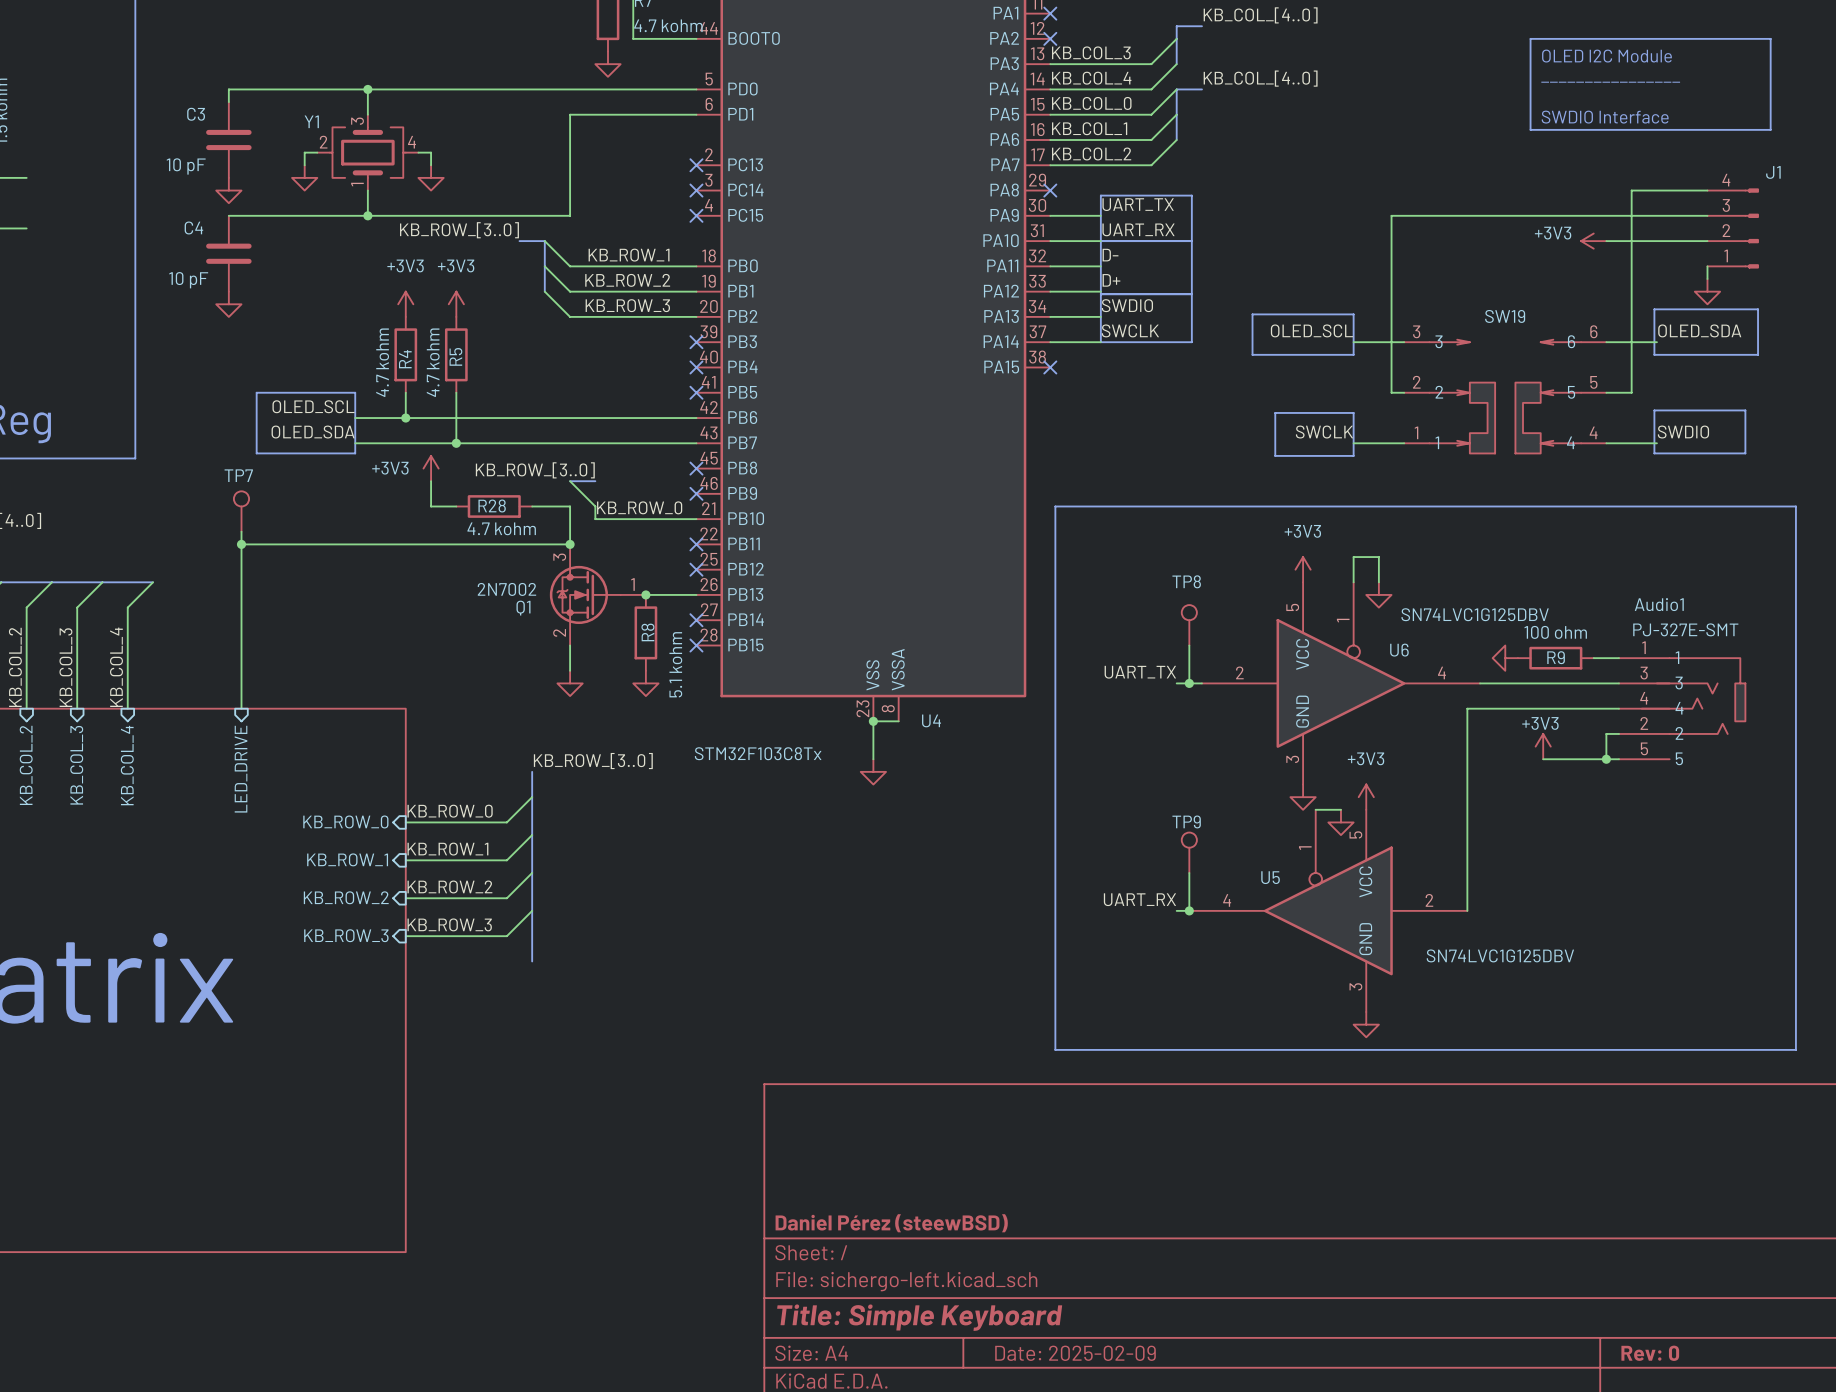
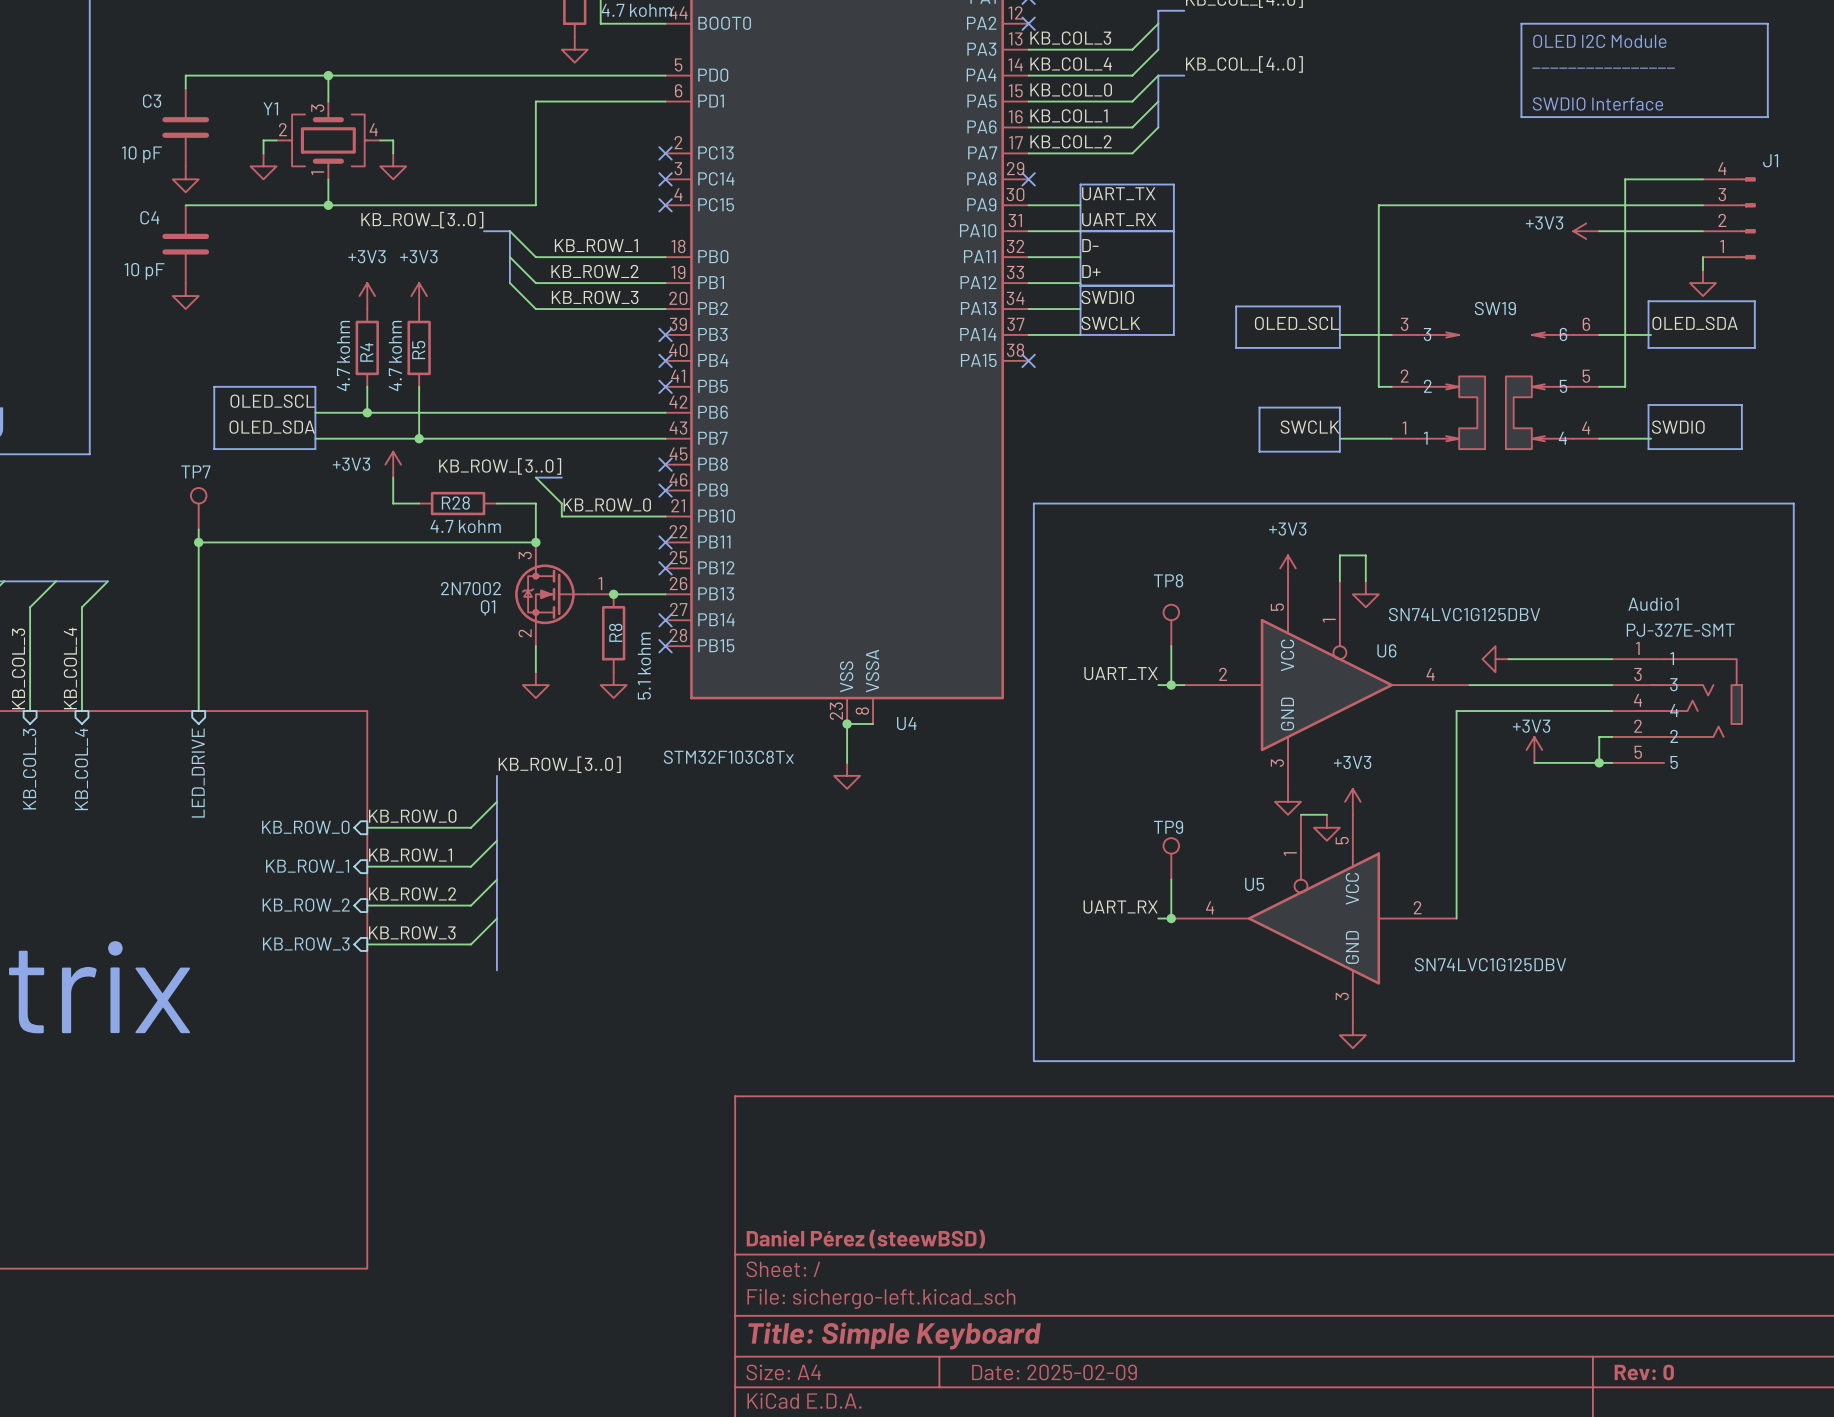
wire: none -> (1508, 659) (1586, 659)
R9: 100 ohm (1555, 658) -> none

